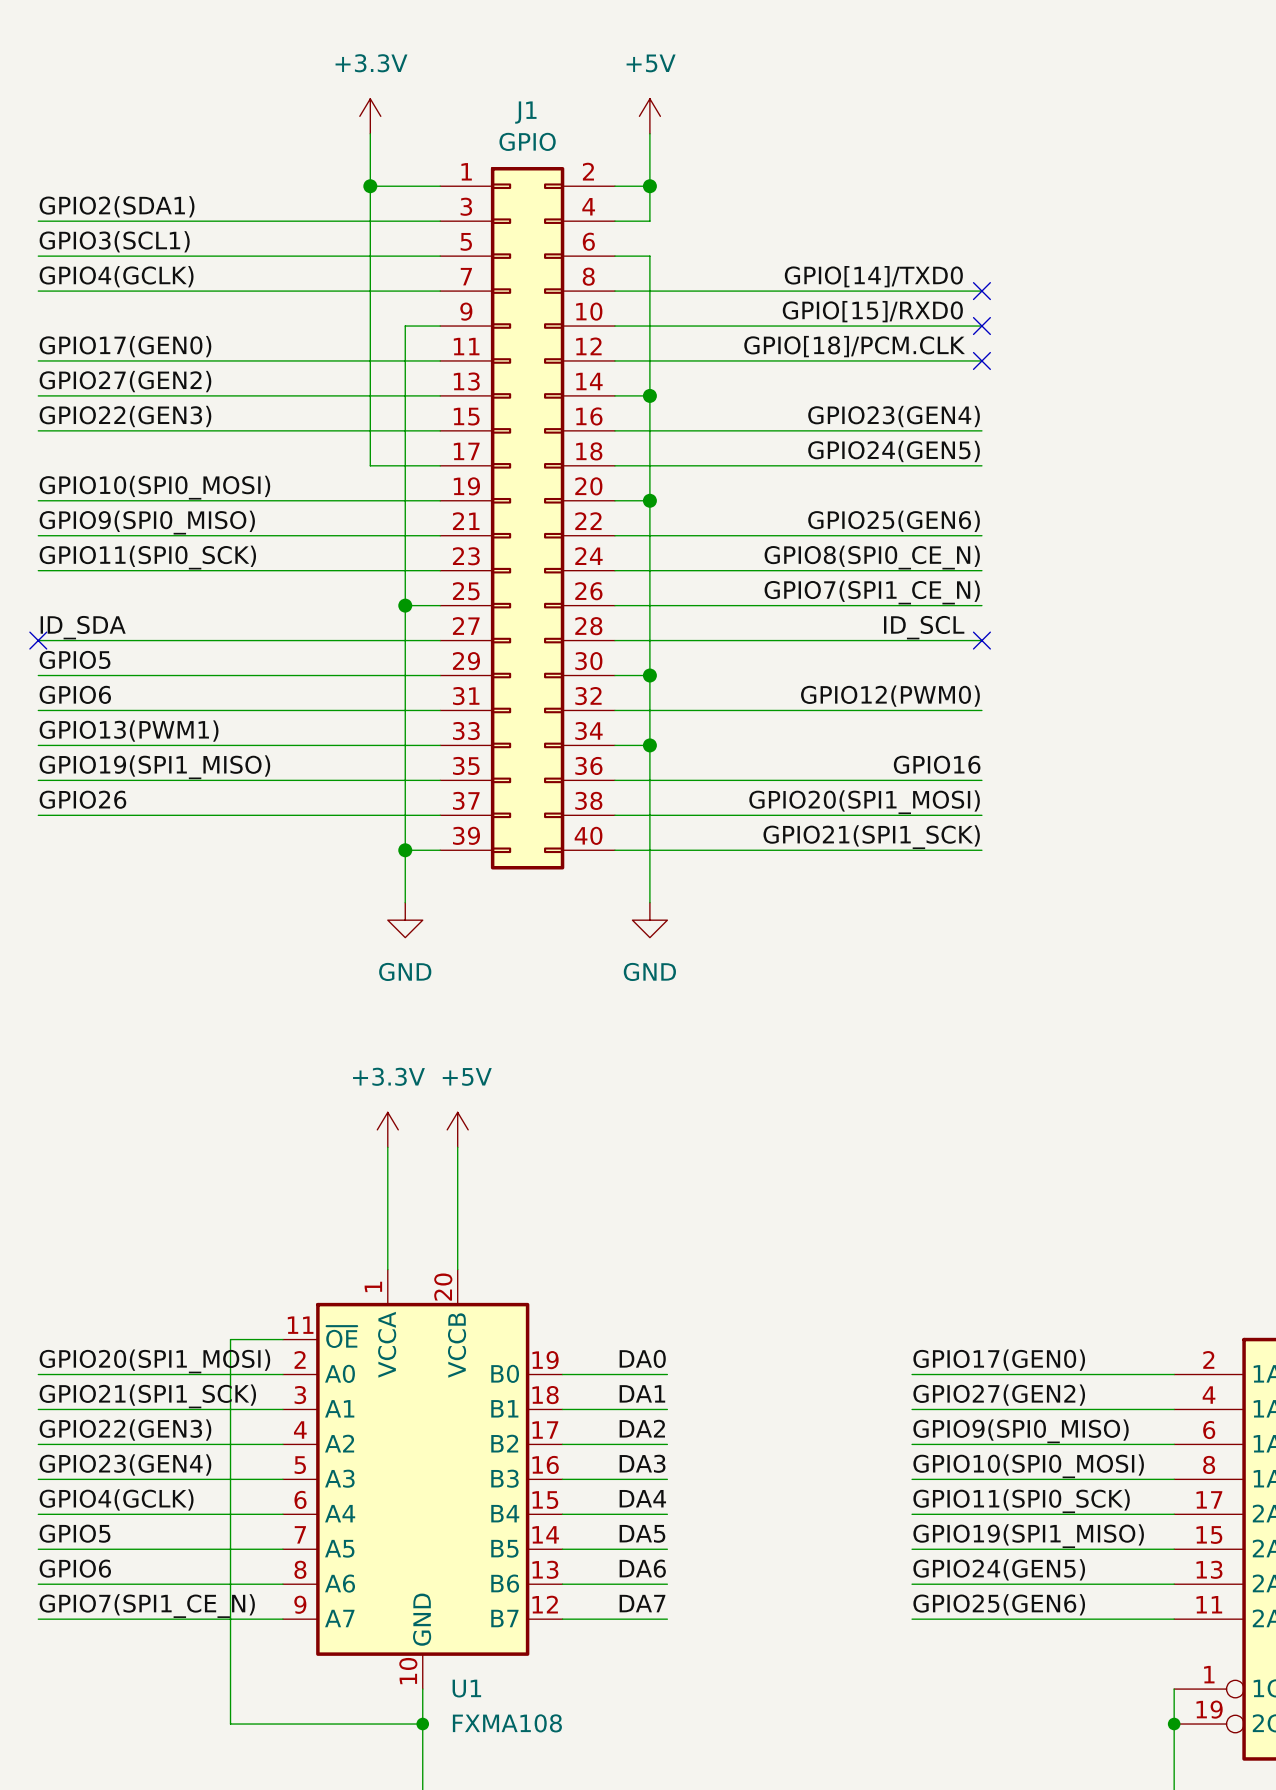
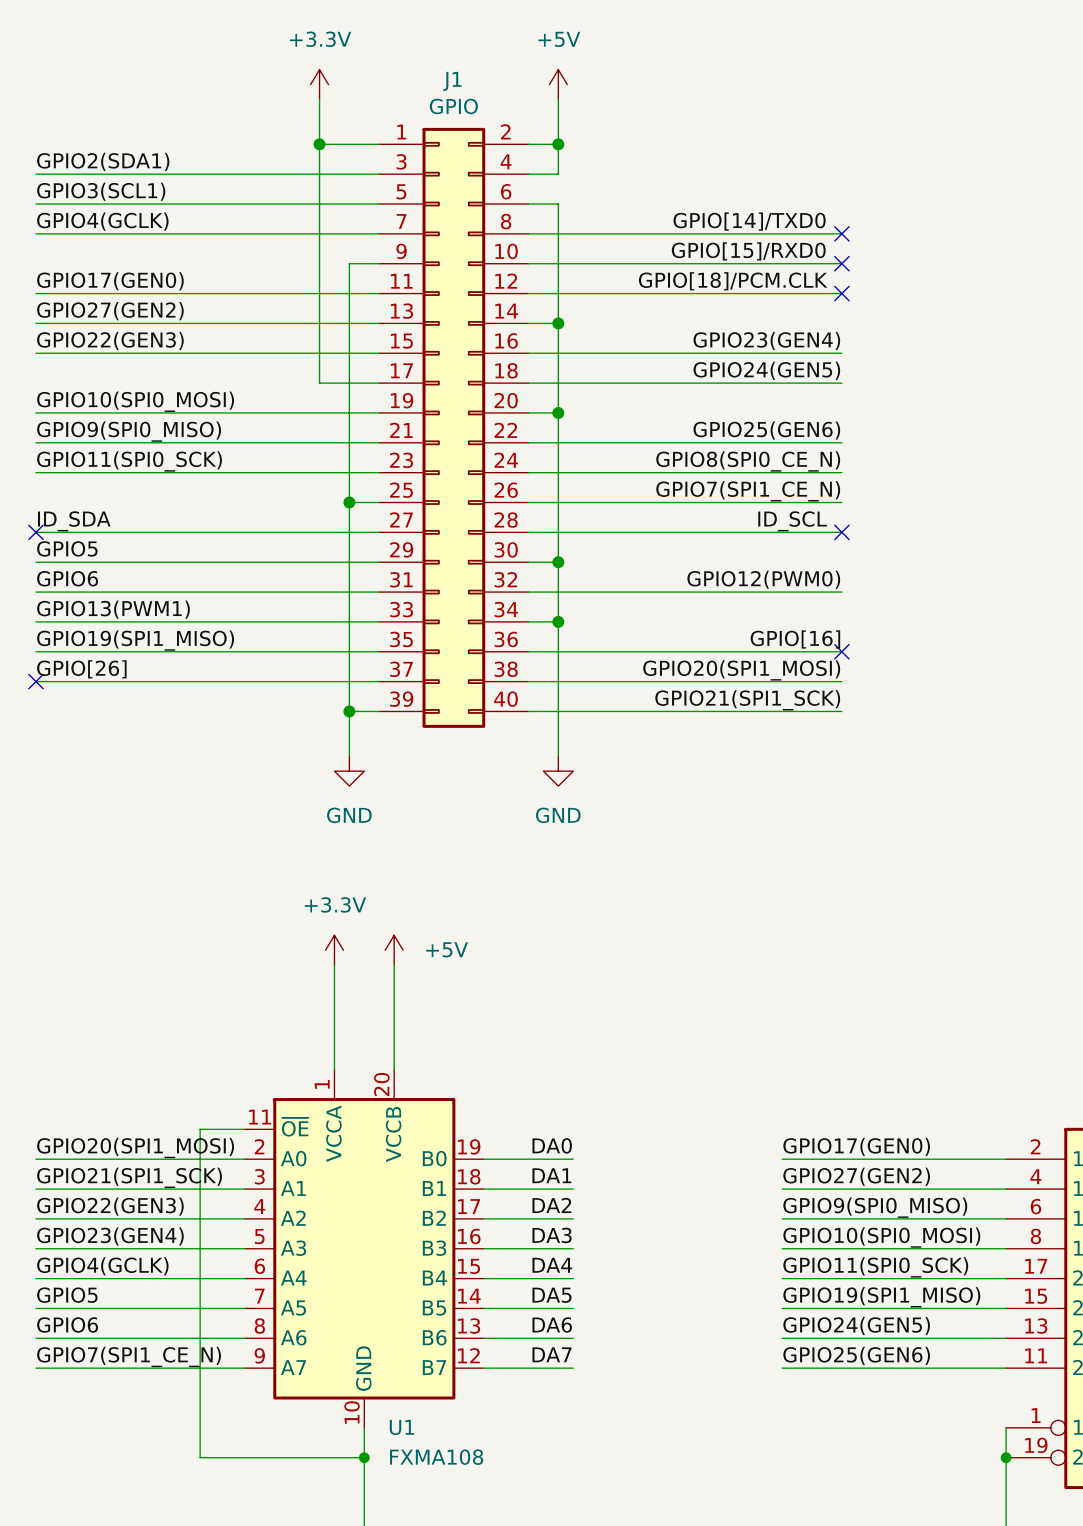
label: GPIO16 (937, 764) -> GPIO[16] (795, 639)
no-connect mark: none -> (841, 651)
label: GPIO26 (82, 799) -> GPIO[26] (81, 669)
no-connect mark: none -> (35, 681)
power symbol text position: +5V (467, 1076) -> +5V (447, 949)

